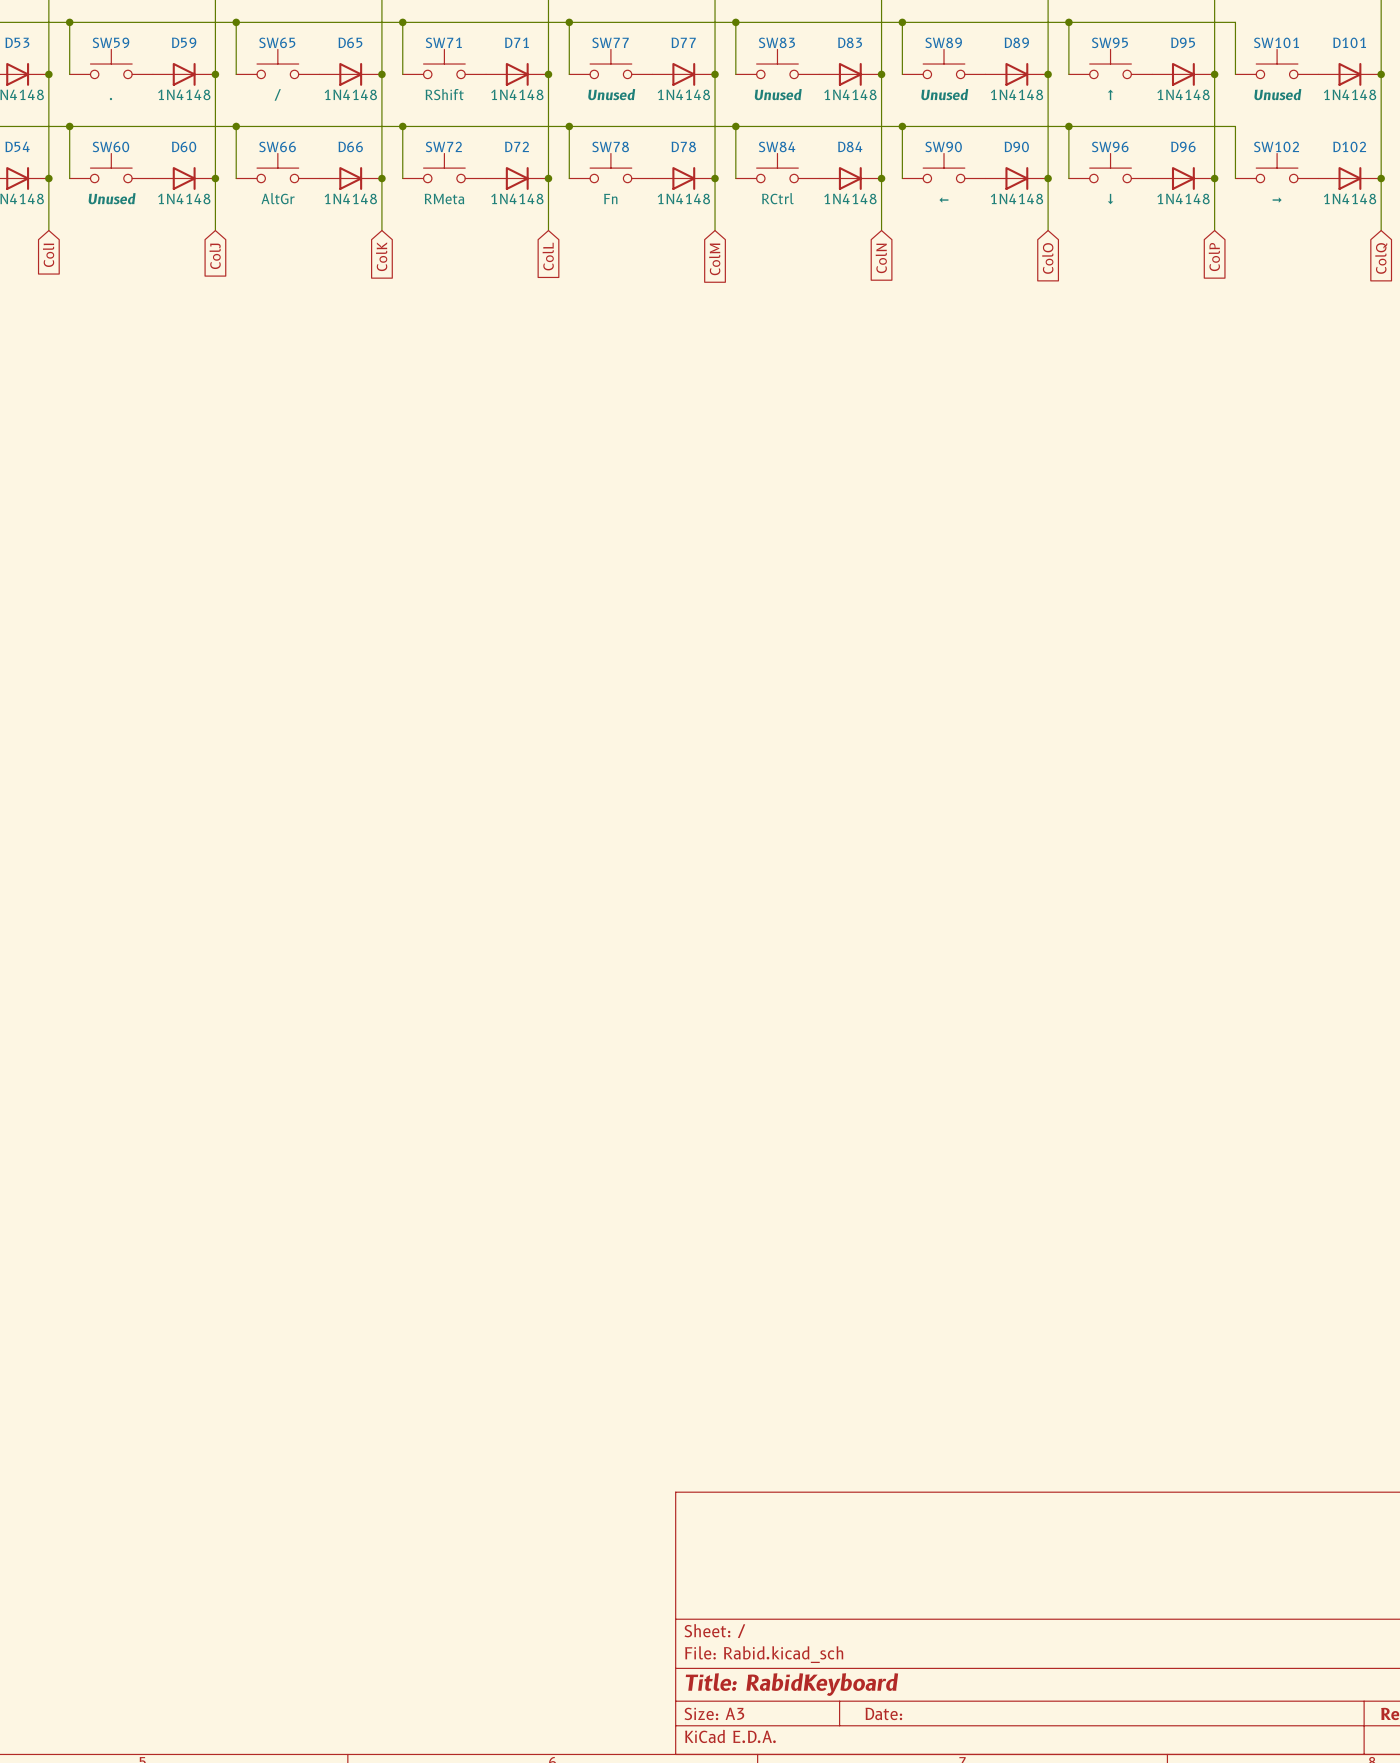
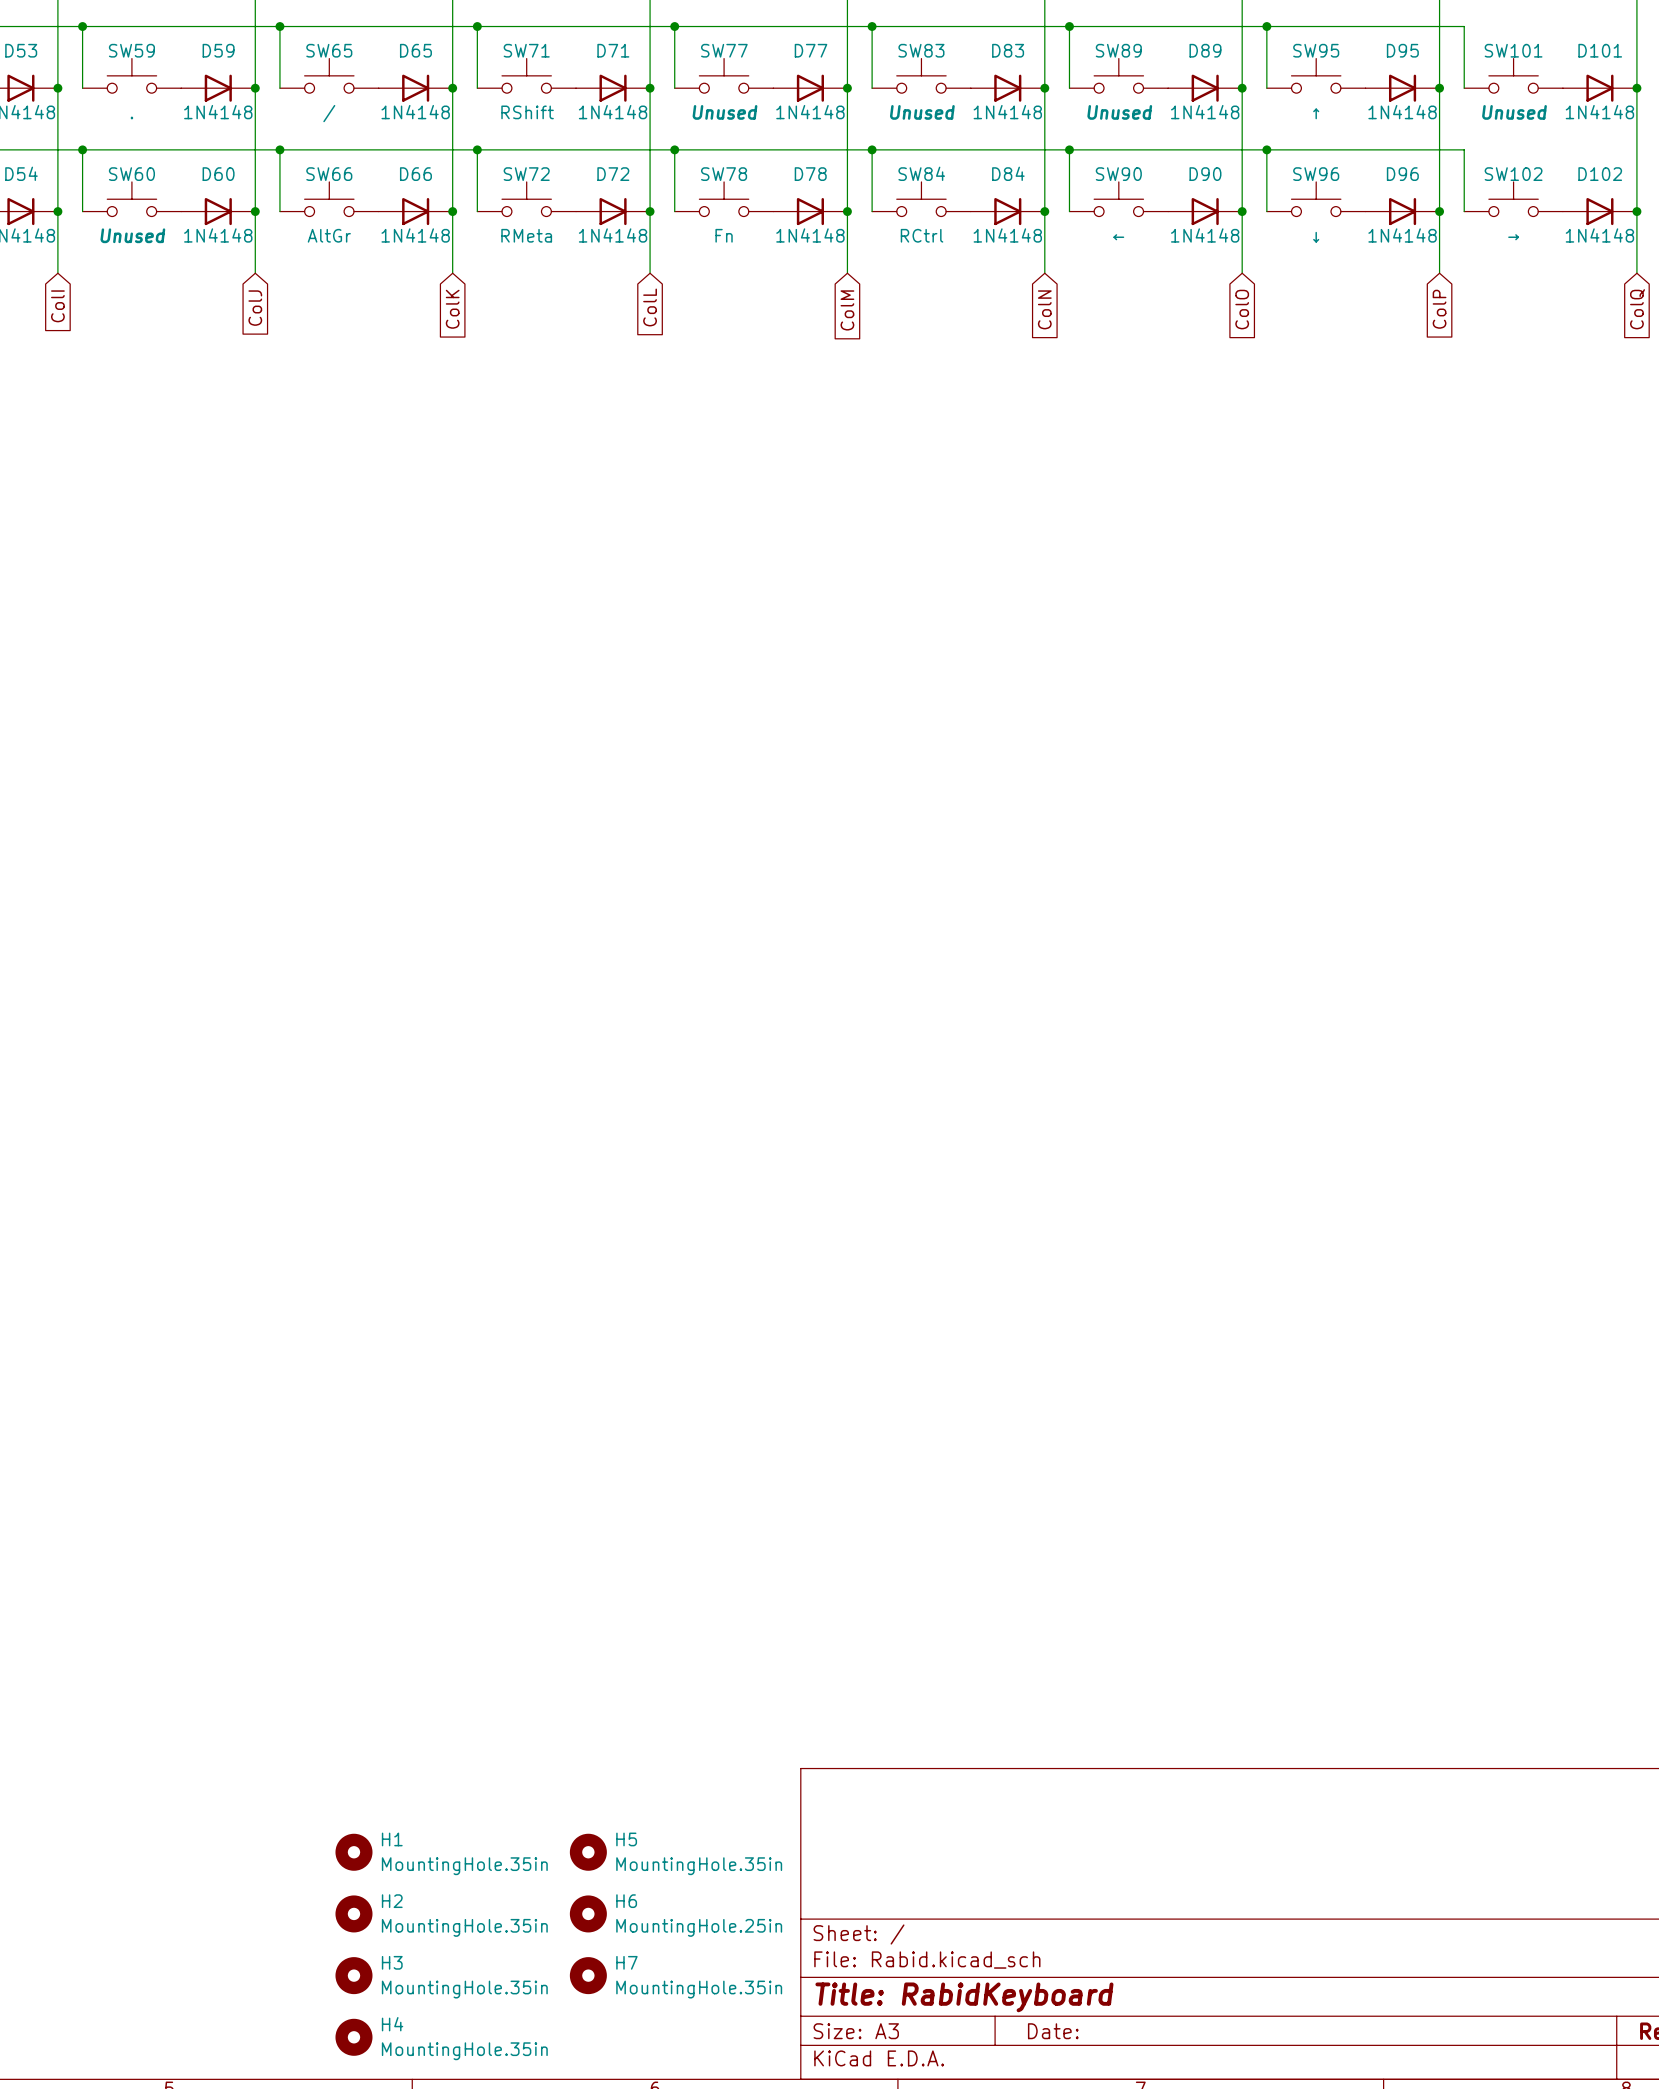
H1: none -> MountingHole.35in (353, 1852)
H5: none -> MountingHole.35in (588, 1852)
H2: none -> MountingHole.35in (353, 1913)
H6: none -> MountingHole.25in (588, 1913)
H3: none -> MountingHole.35in (353, 1975)
H7: none -> MountingHole.35in (588, 1975)
H4: none -> MountingHole.35in (353, 2037)

